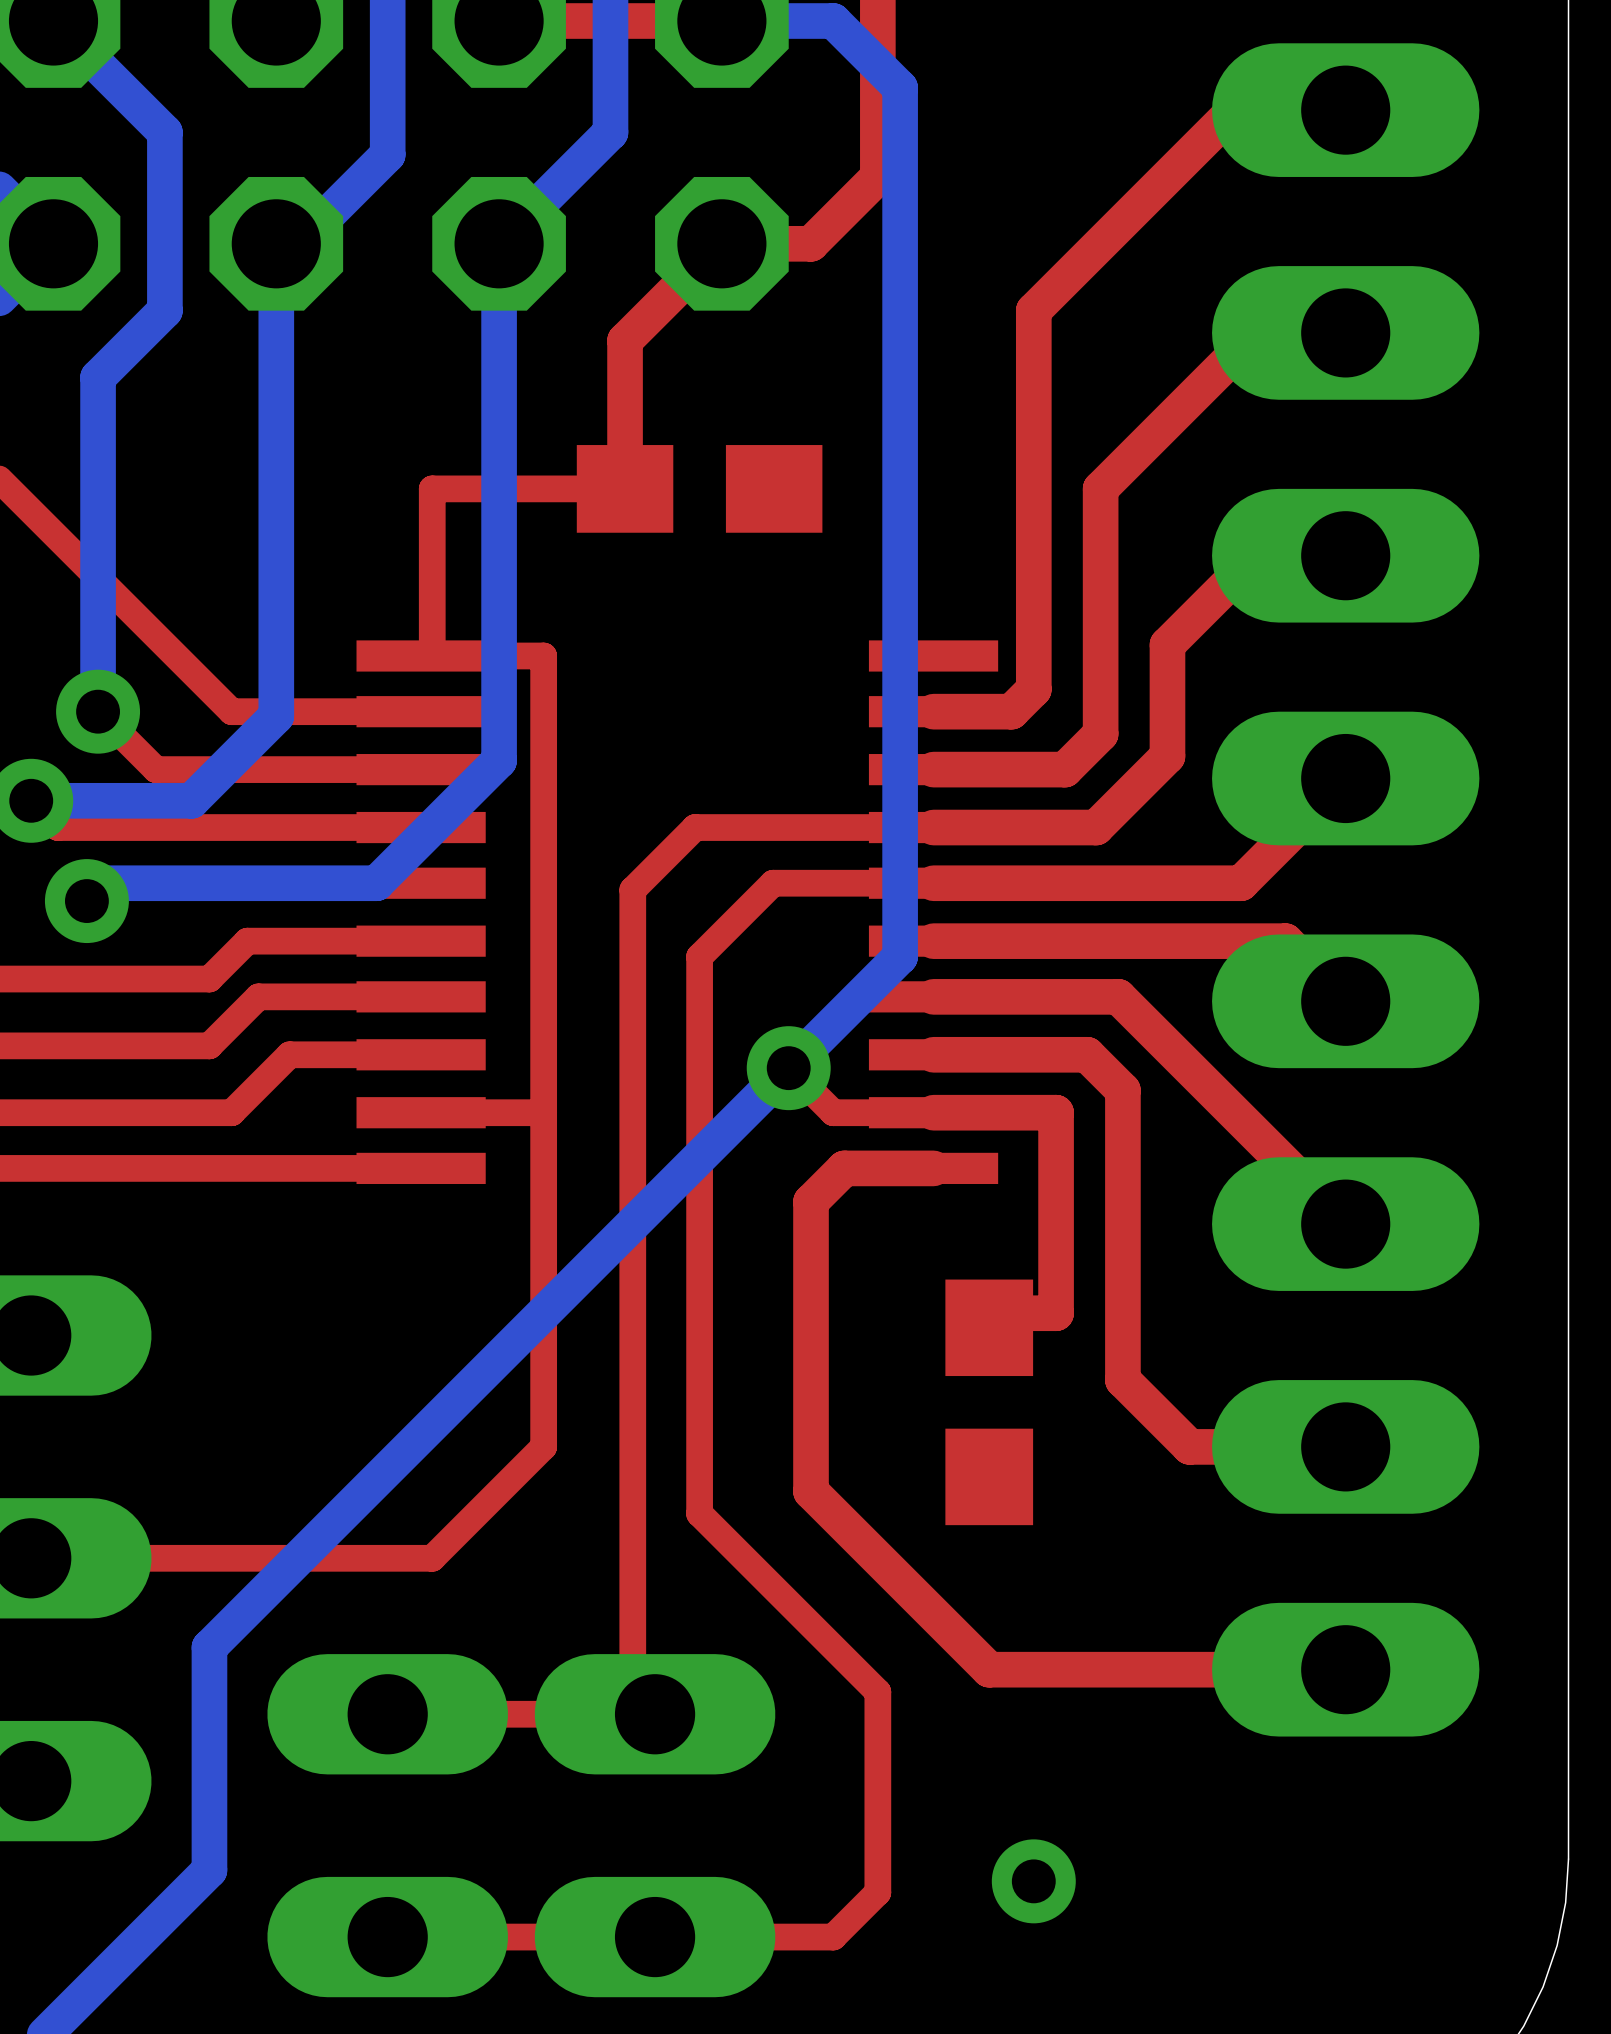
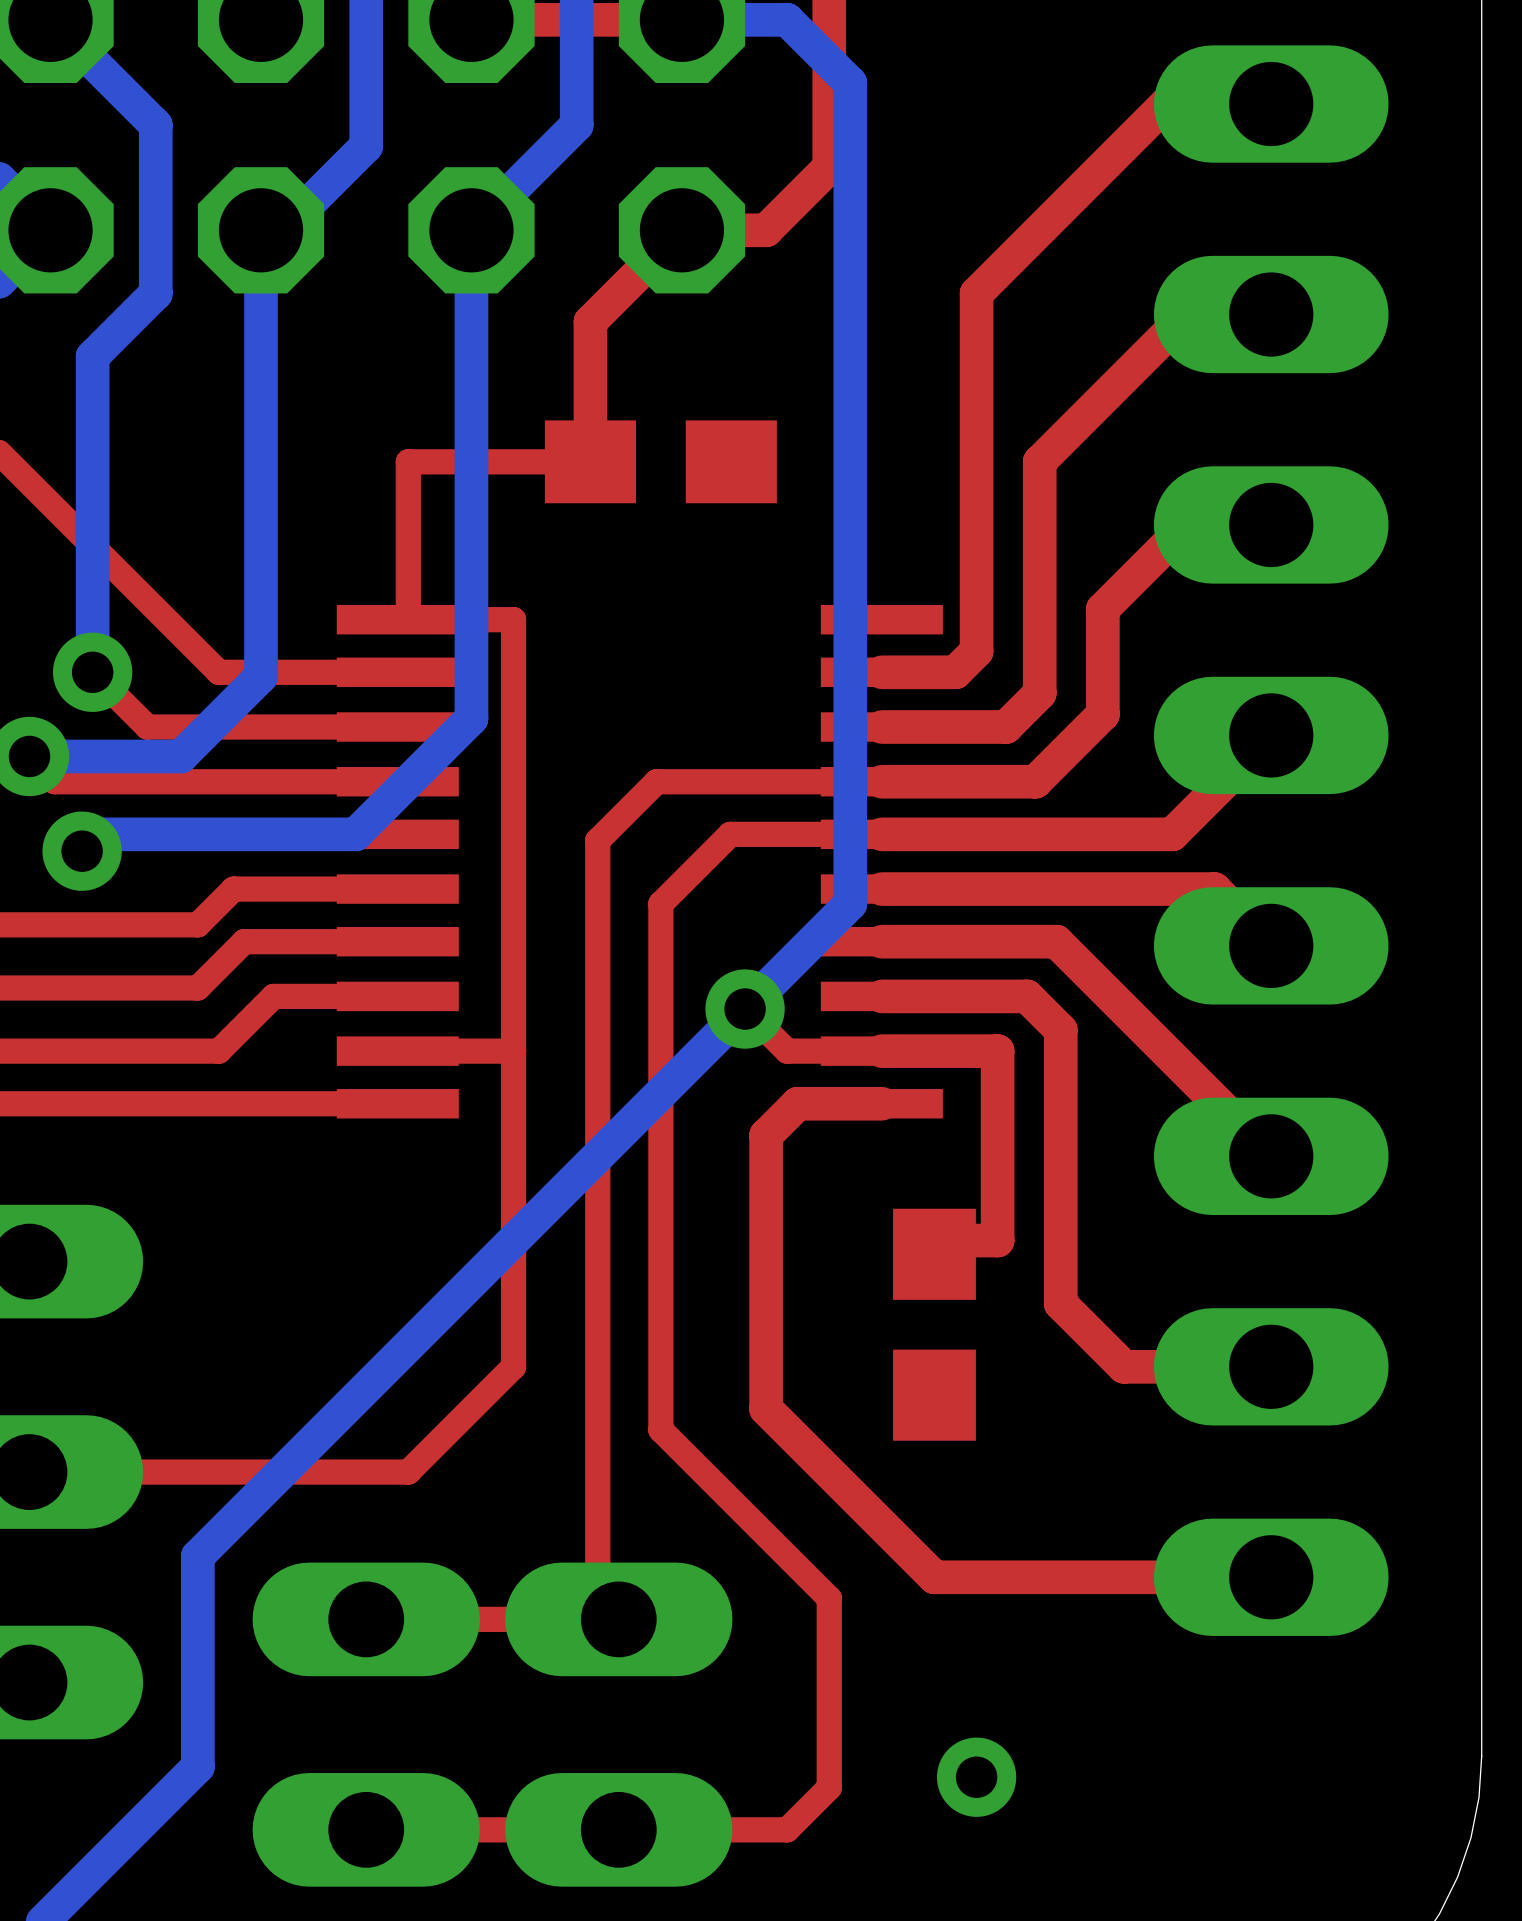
part footprint: [1212, 43, 1480, 1737] -> [1153, 45, 1389, 1636]

